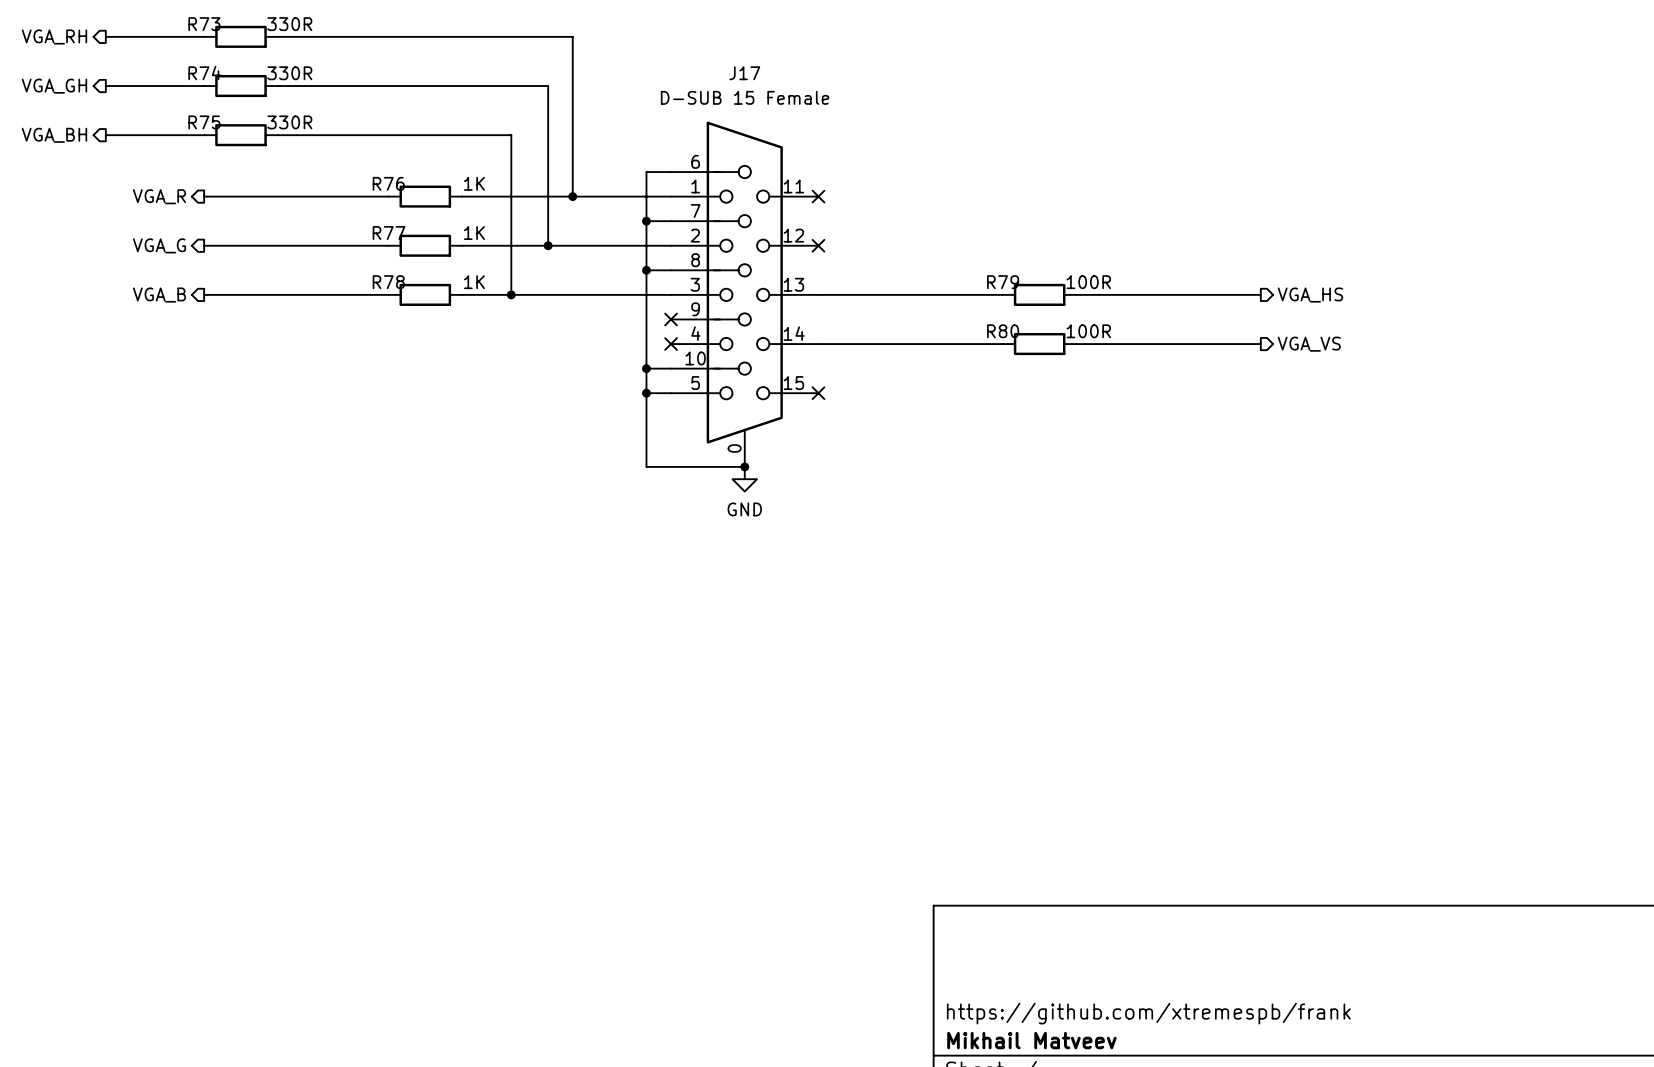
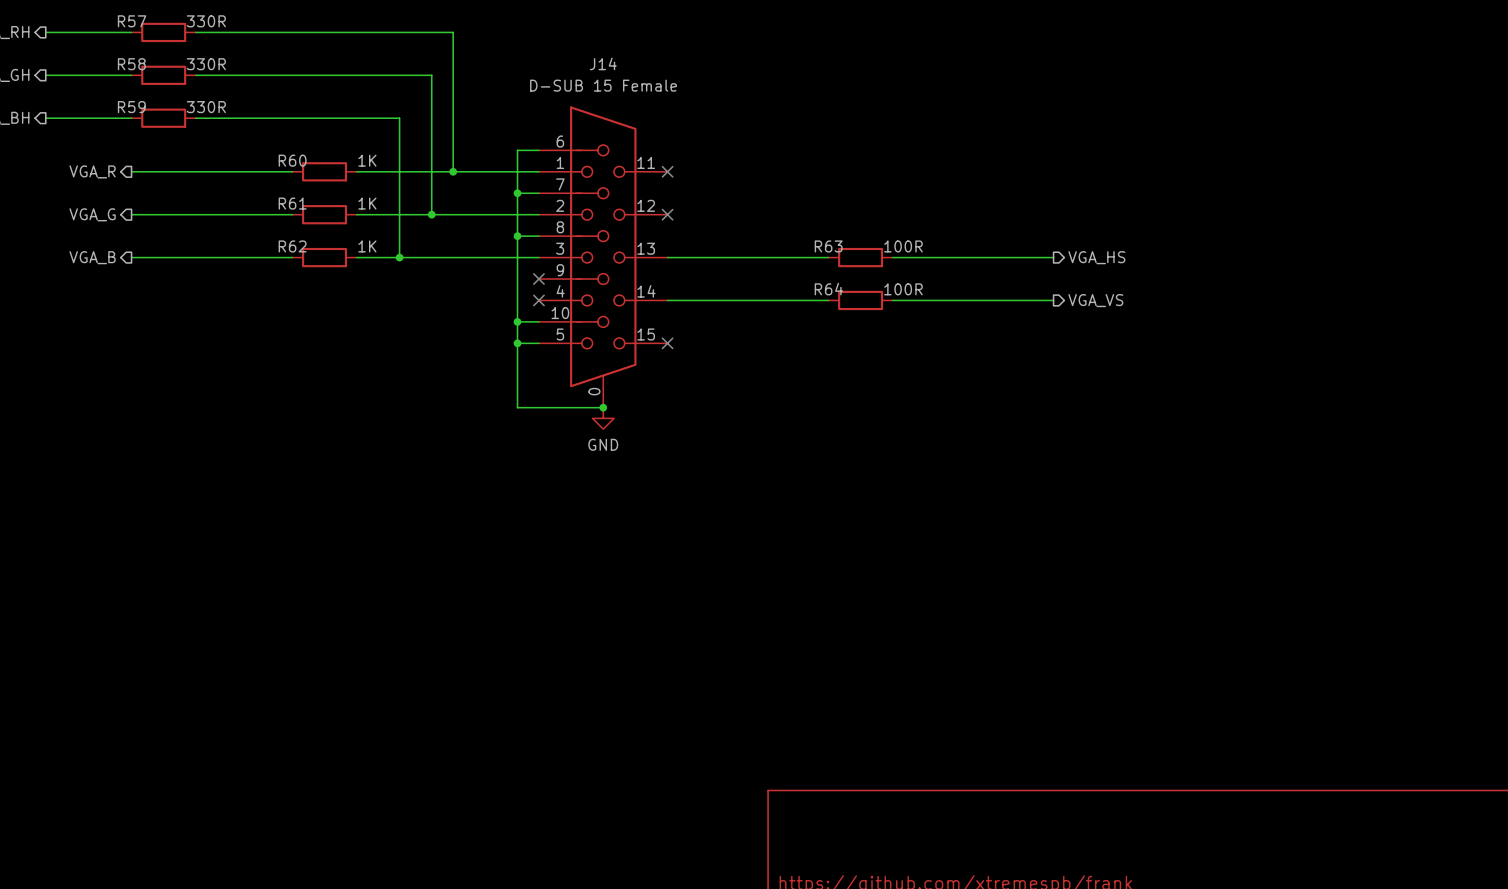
R73 name: R73 (204, 24) -> R57 (132, 21)
R74 name: R74 (204, 72) -> R58 (131, 64)
J17 name: J17 (744, 73) -> J14 (603, 63)
R75 name: R75 (204, 122) -> R59 (131, 107)
R76 name: R76 (388, 183) -> R60 (292, 160)
R77 name: R77 (389, 233) -> R61 (292, 203)
R78 name: R78 (388, 282) -> R62 (292, 246)
R79 name: R79 (1003, 282) -> R63 (828, 246)
R80 name: R80 (1003, 331) -> R64 (828, 289)

